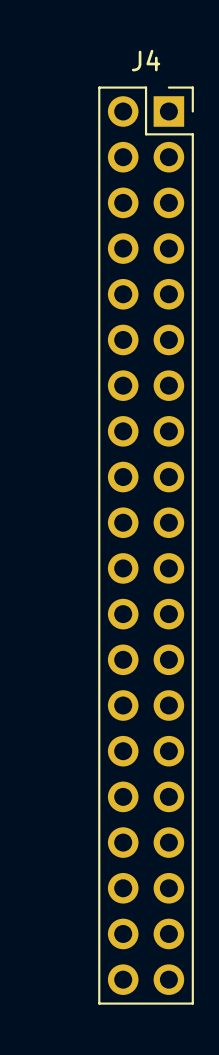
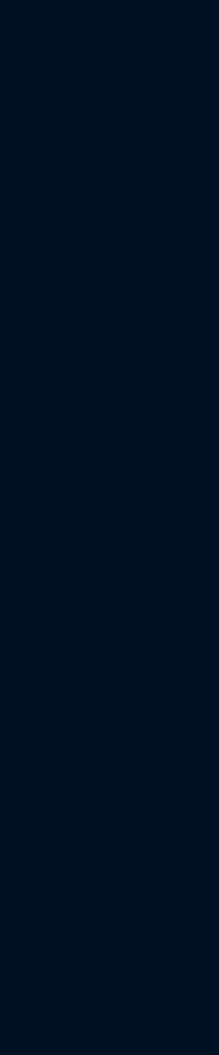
J4: (146, 545) -> none

